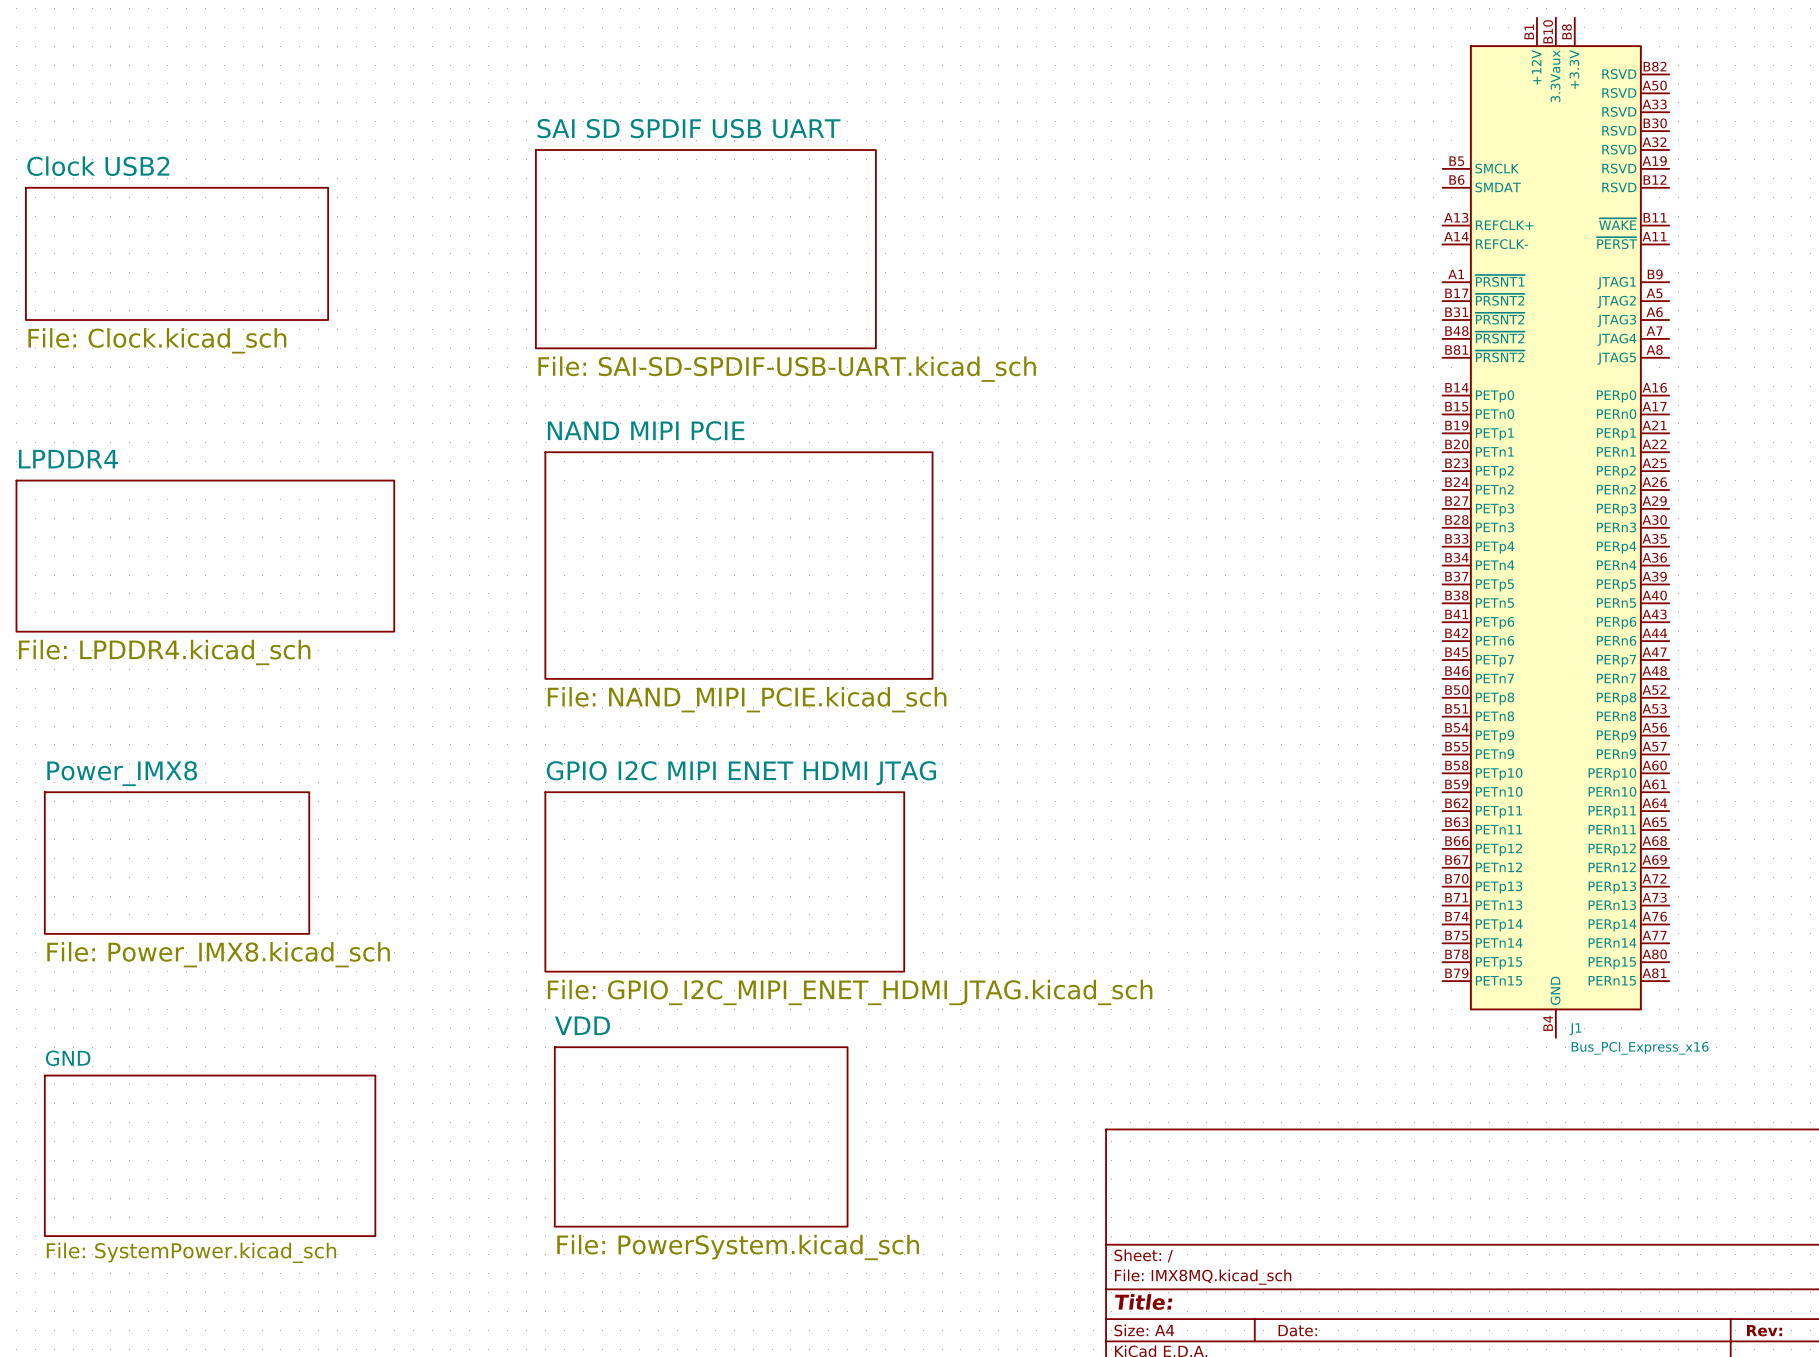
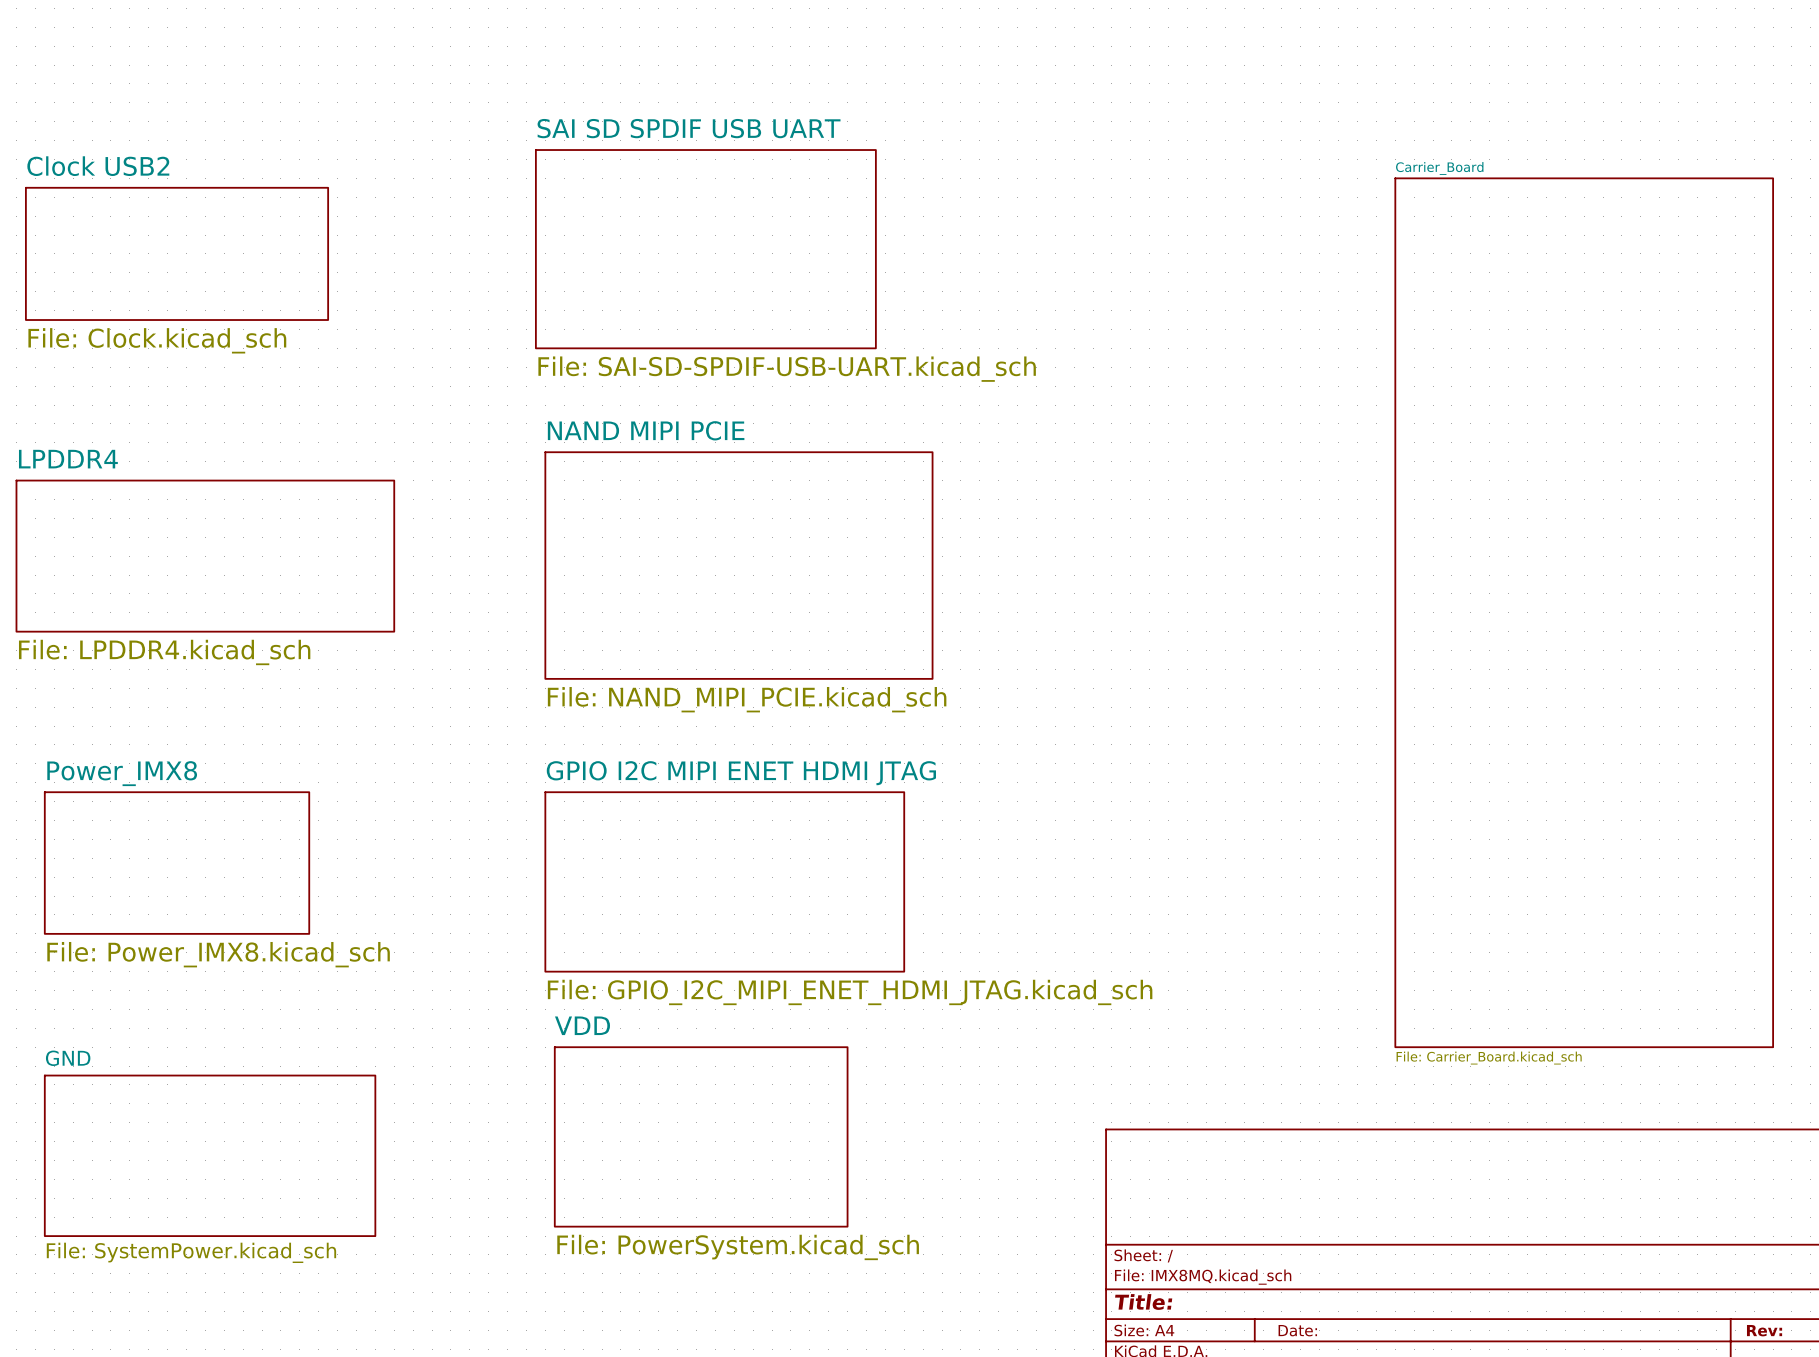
J1: Bus_PCI_Express_x16 (1555, 527) -> none
sheet Carrier_Board: none -> File: Carrier_Board.kicad_sch (1584, 612)

